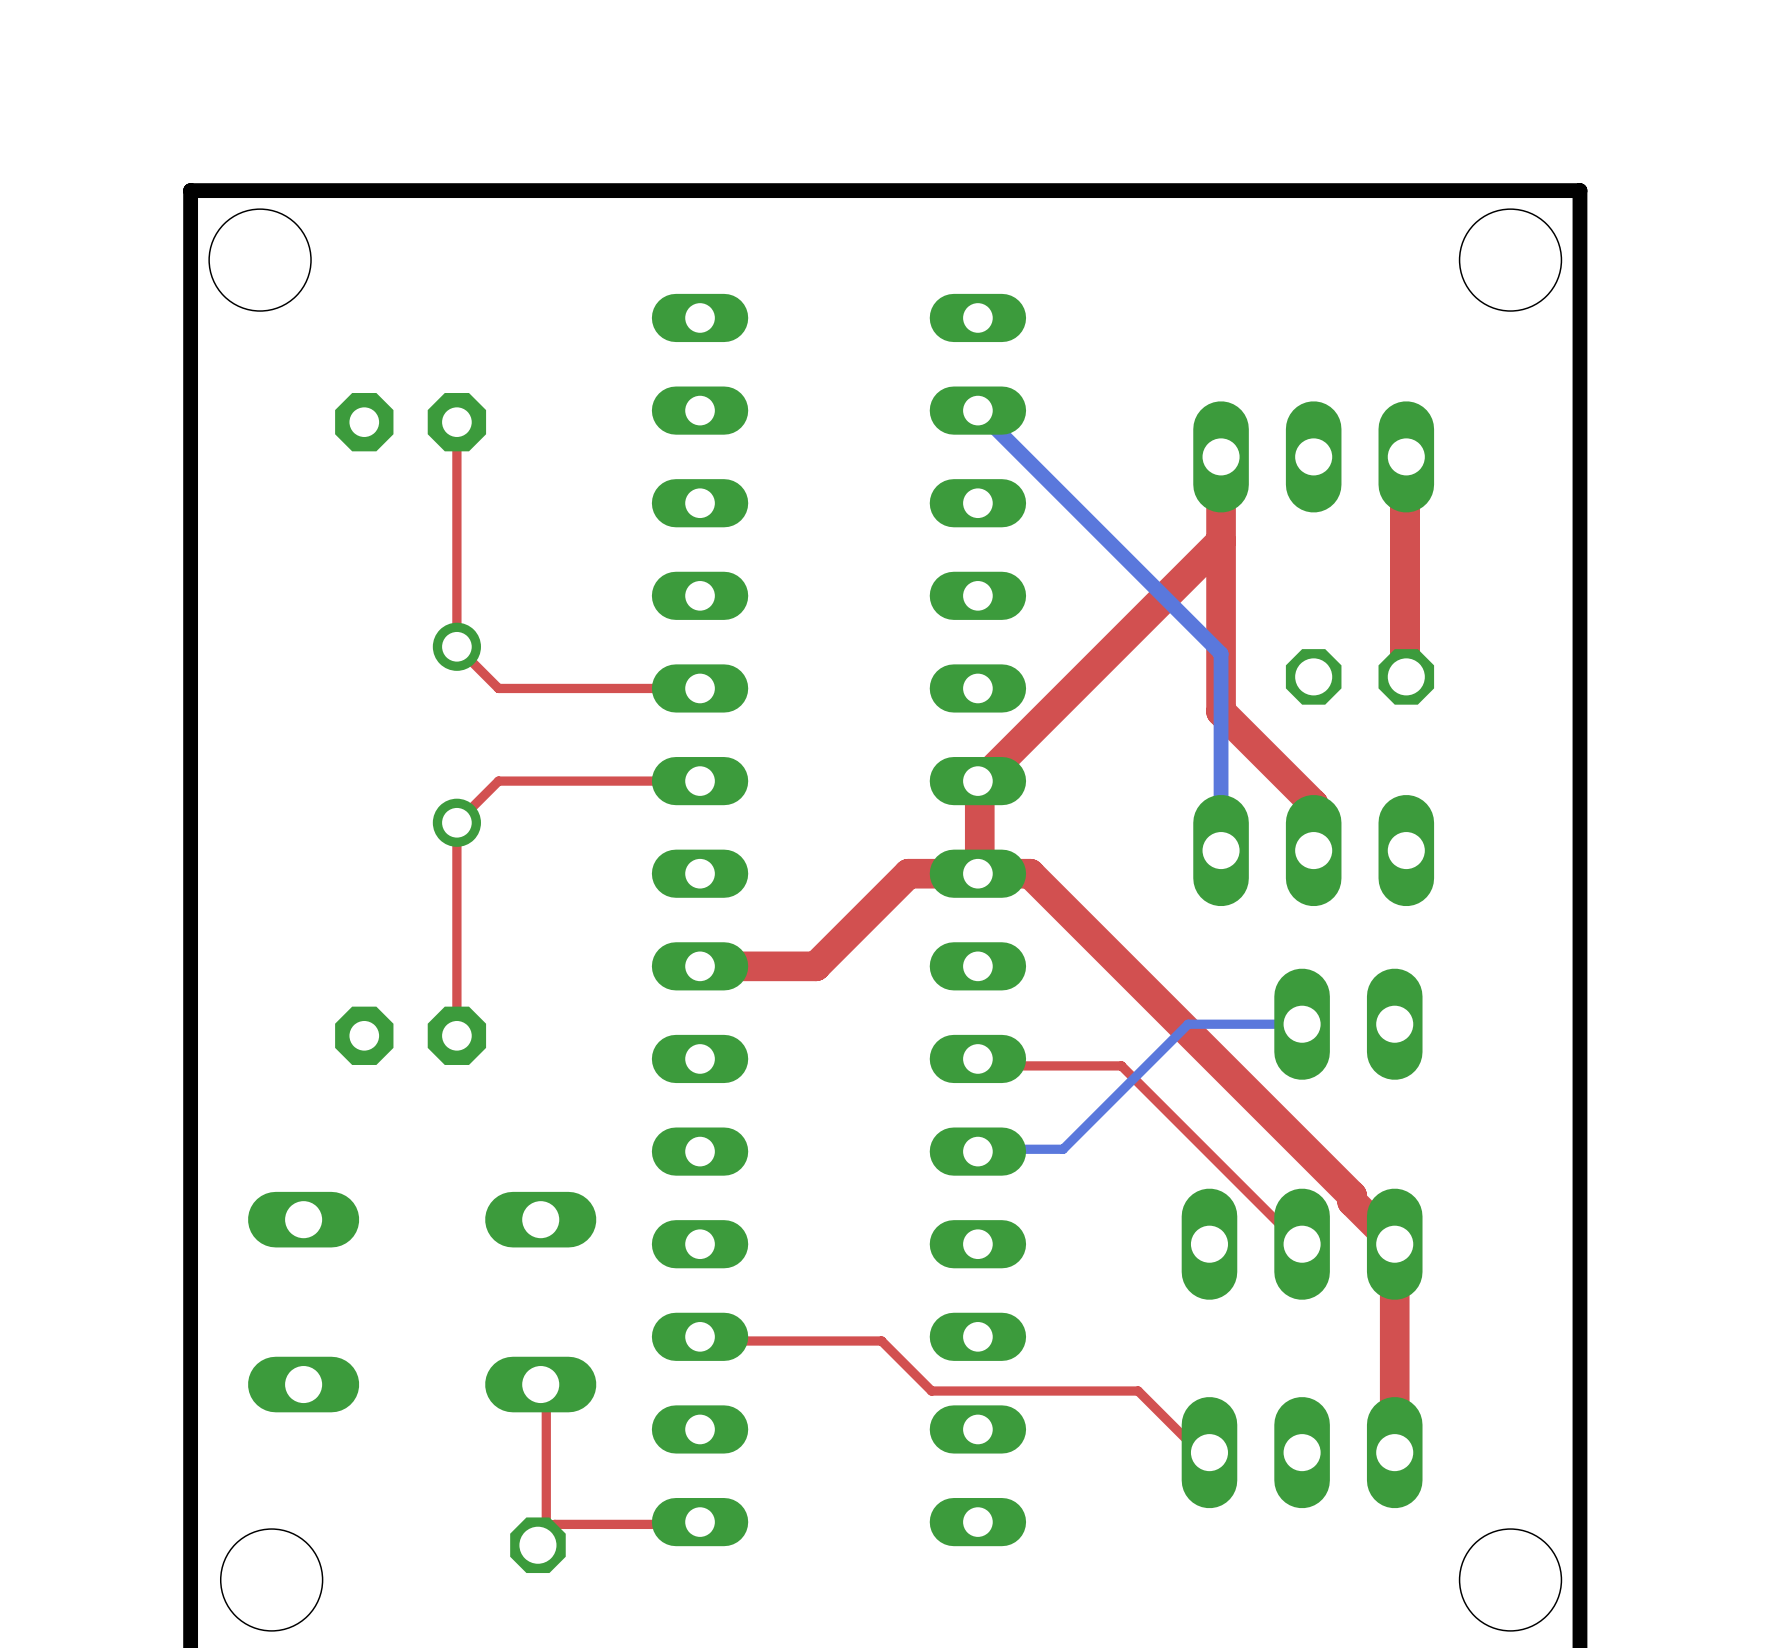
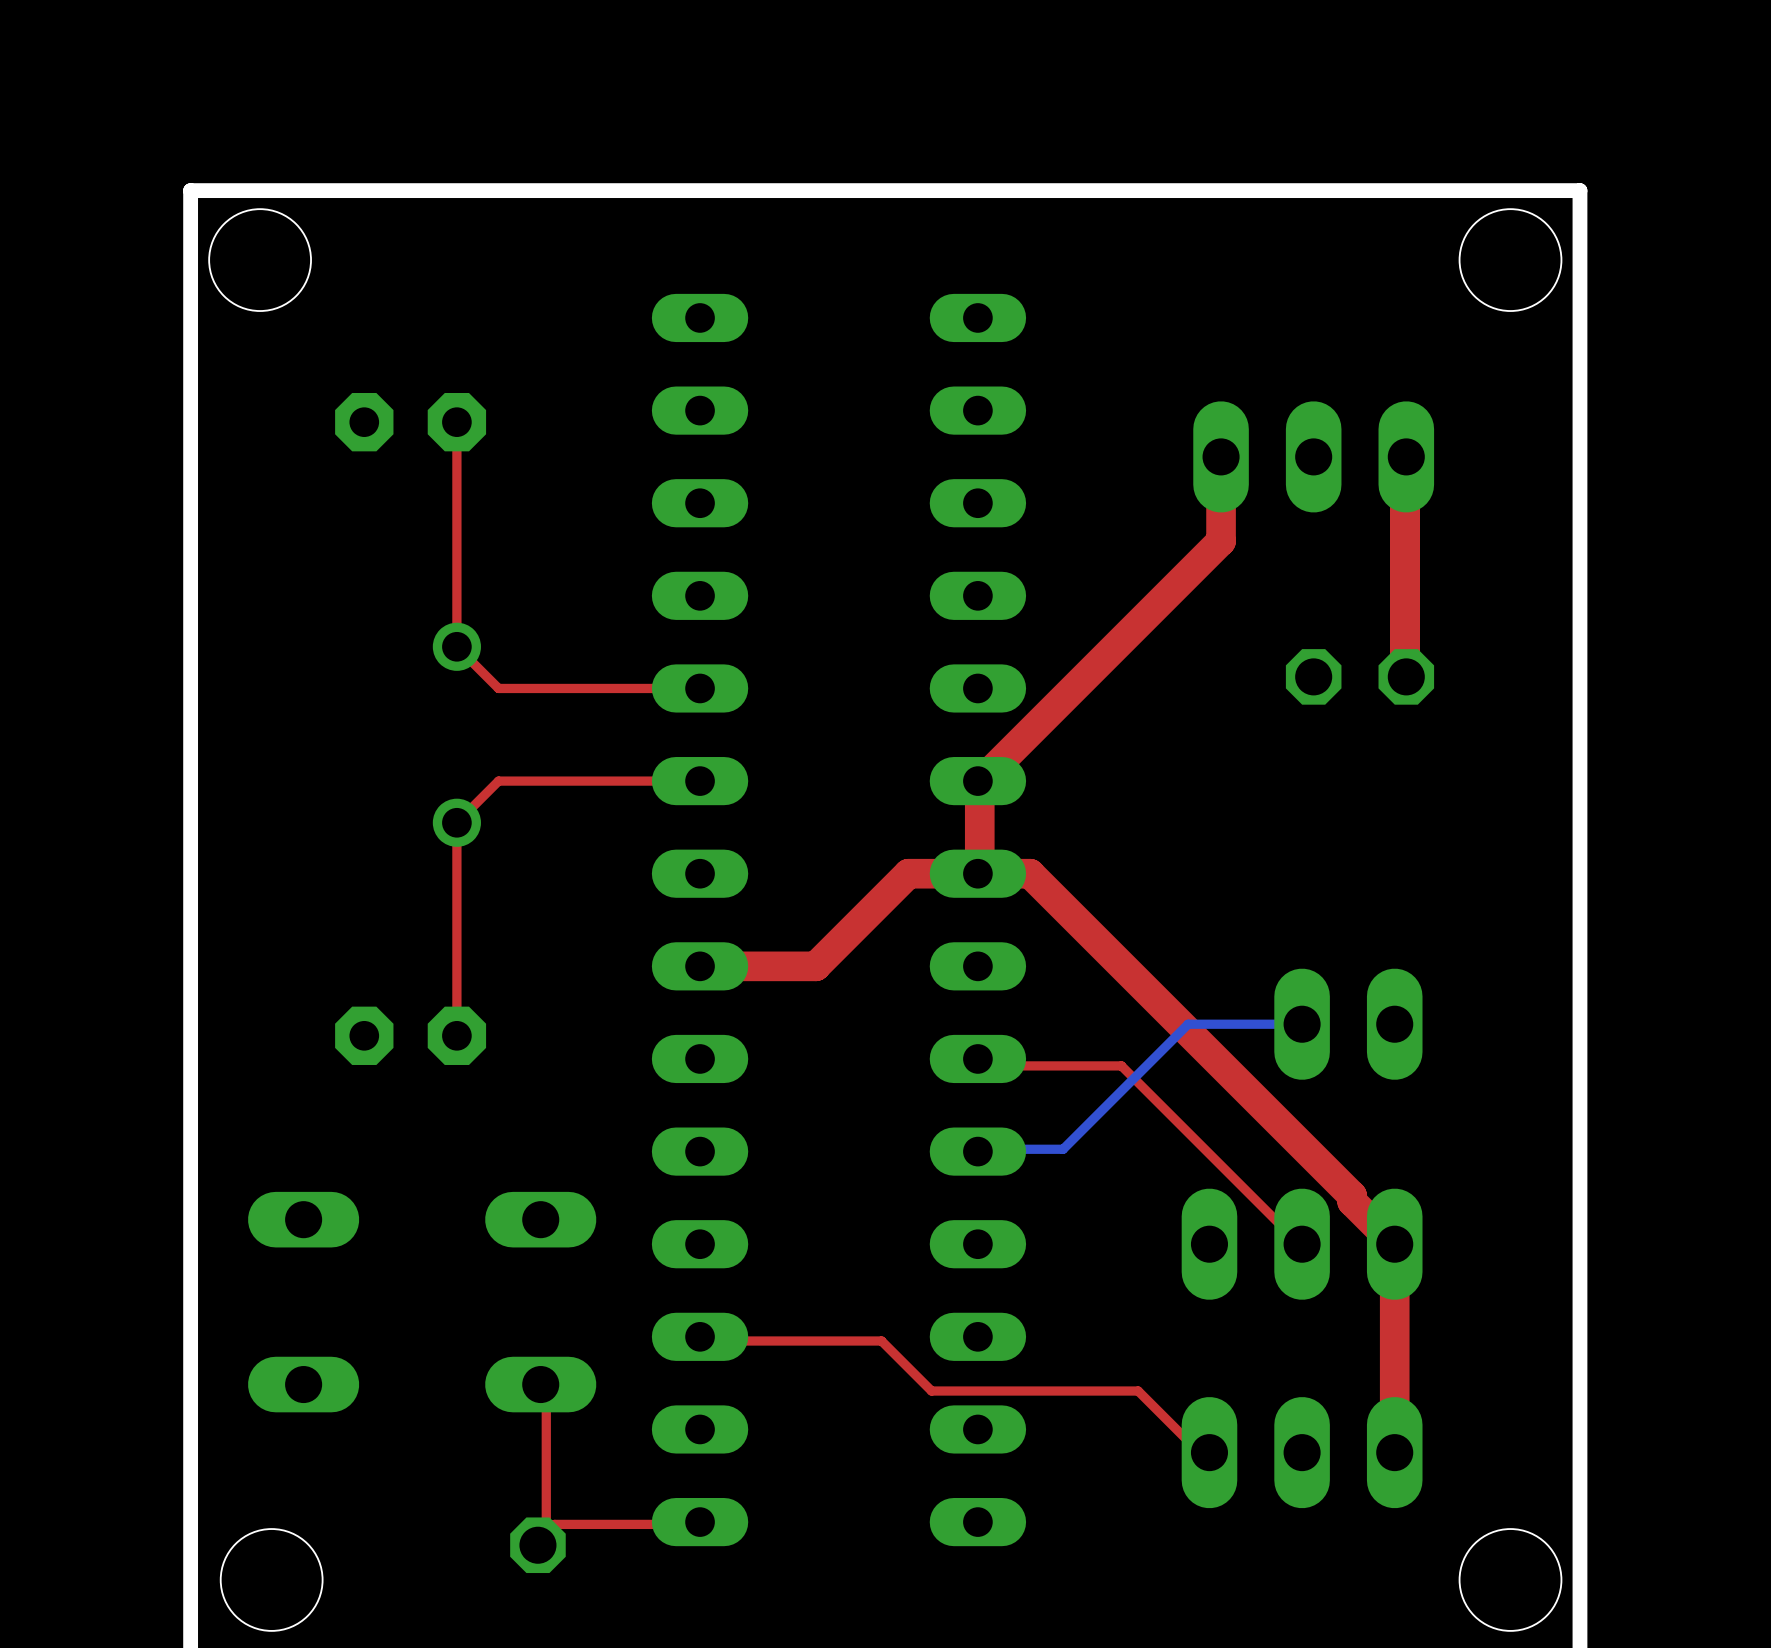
bottom track: (977, 410) (1221, 653) (1221, 850) -> none
top track: (1221, 541) (1221, 711) (1313, 804) (1313, 850) -> none
part: (1313, 850) -> none

